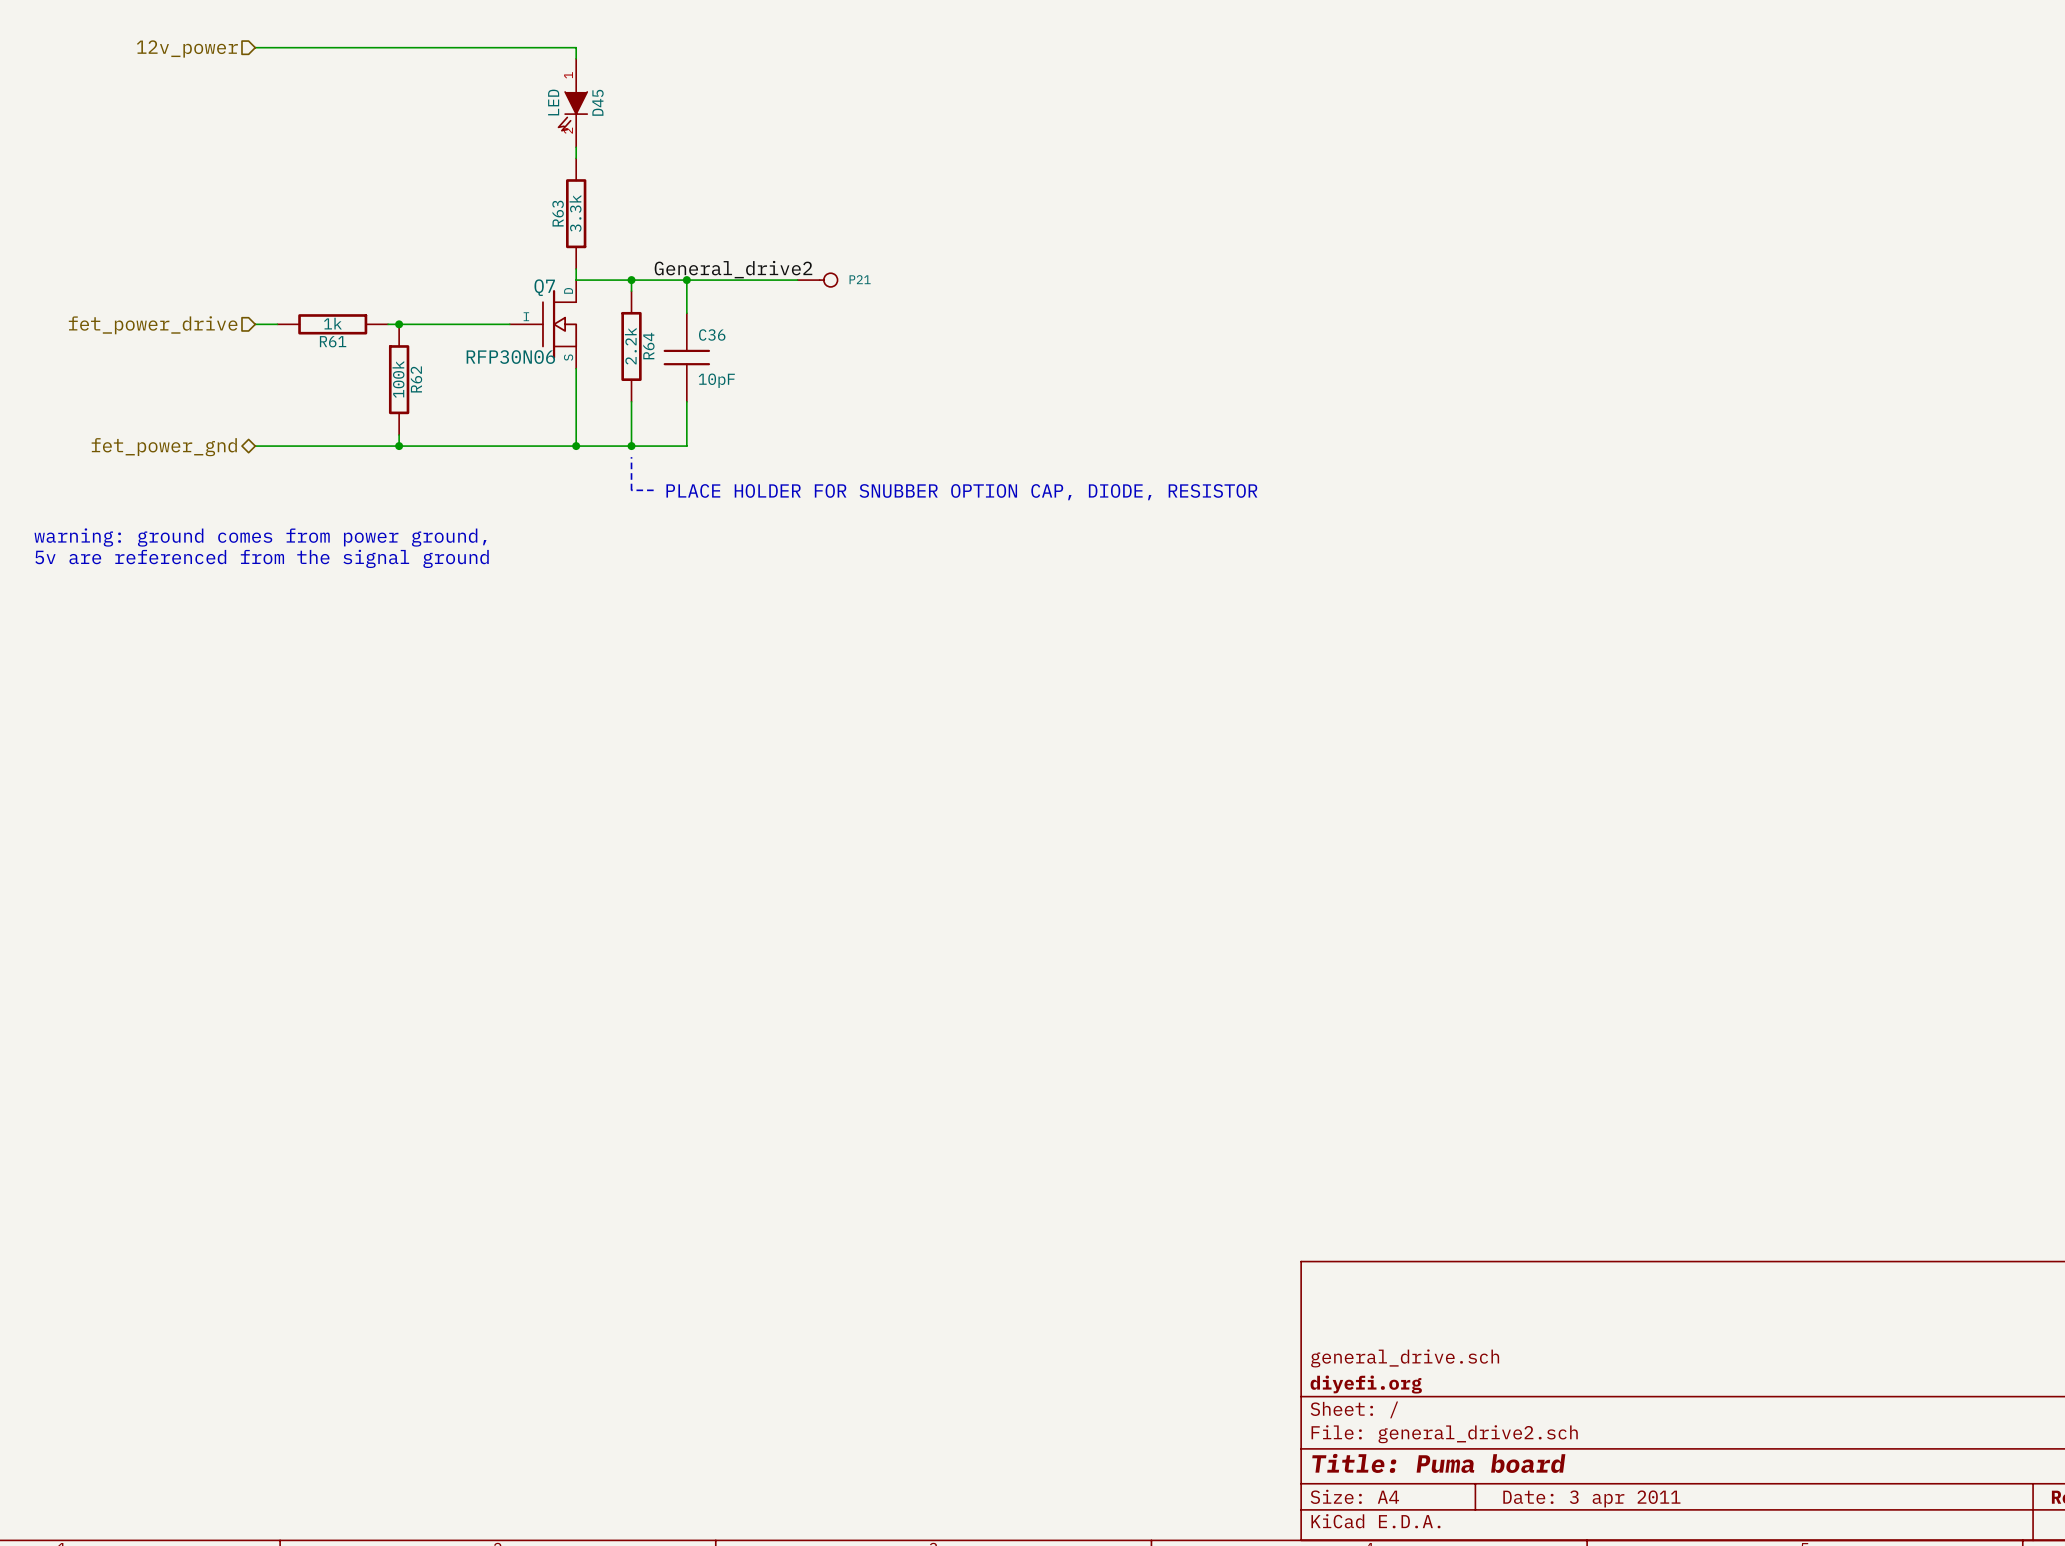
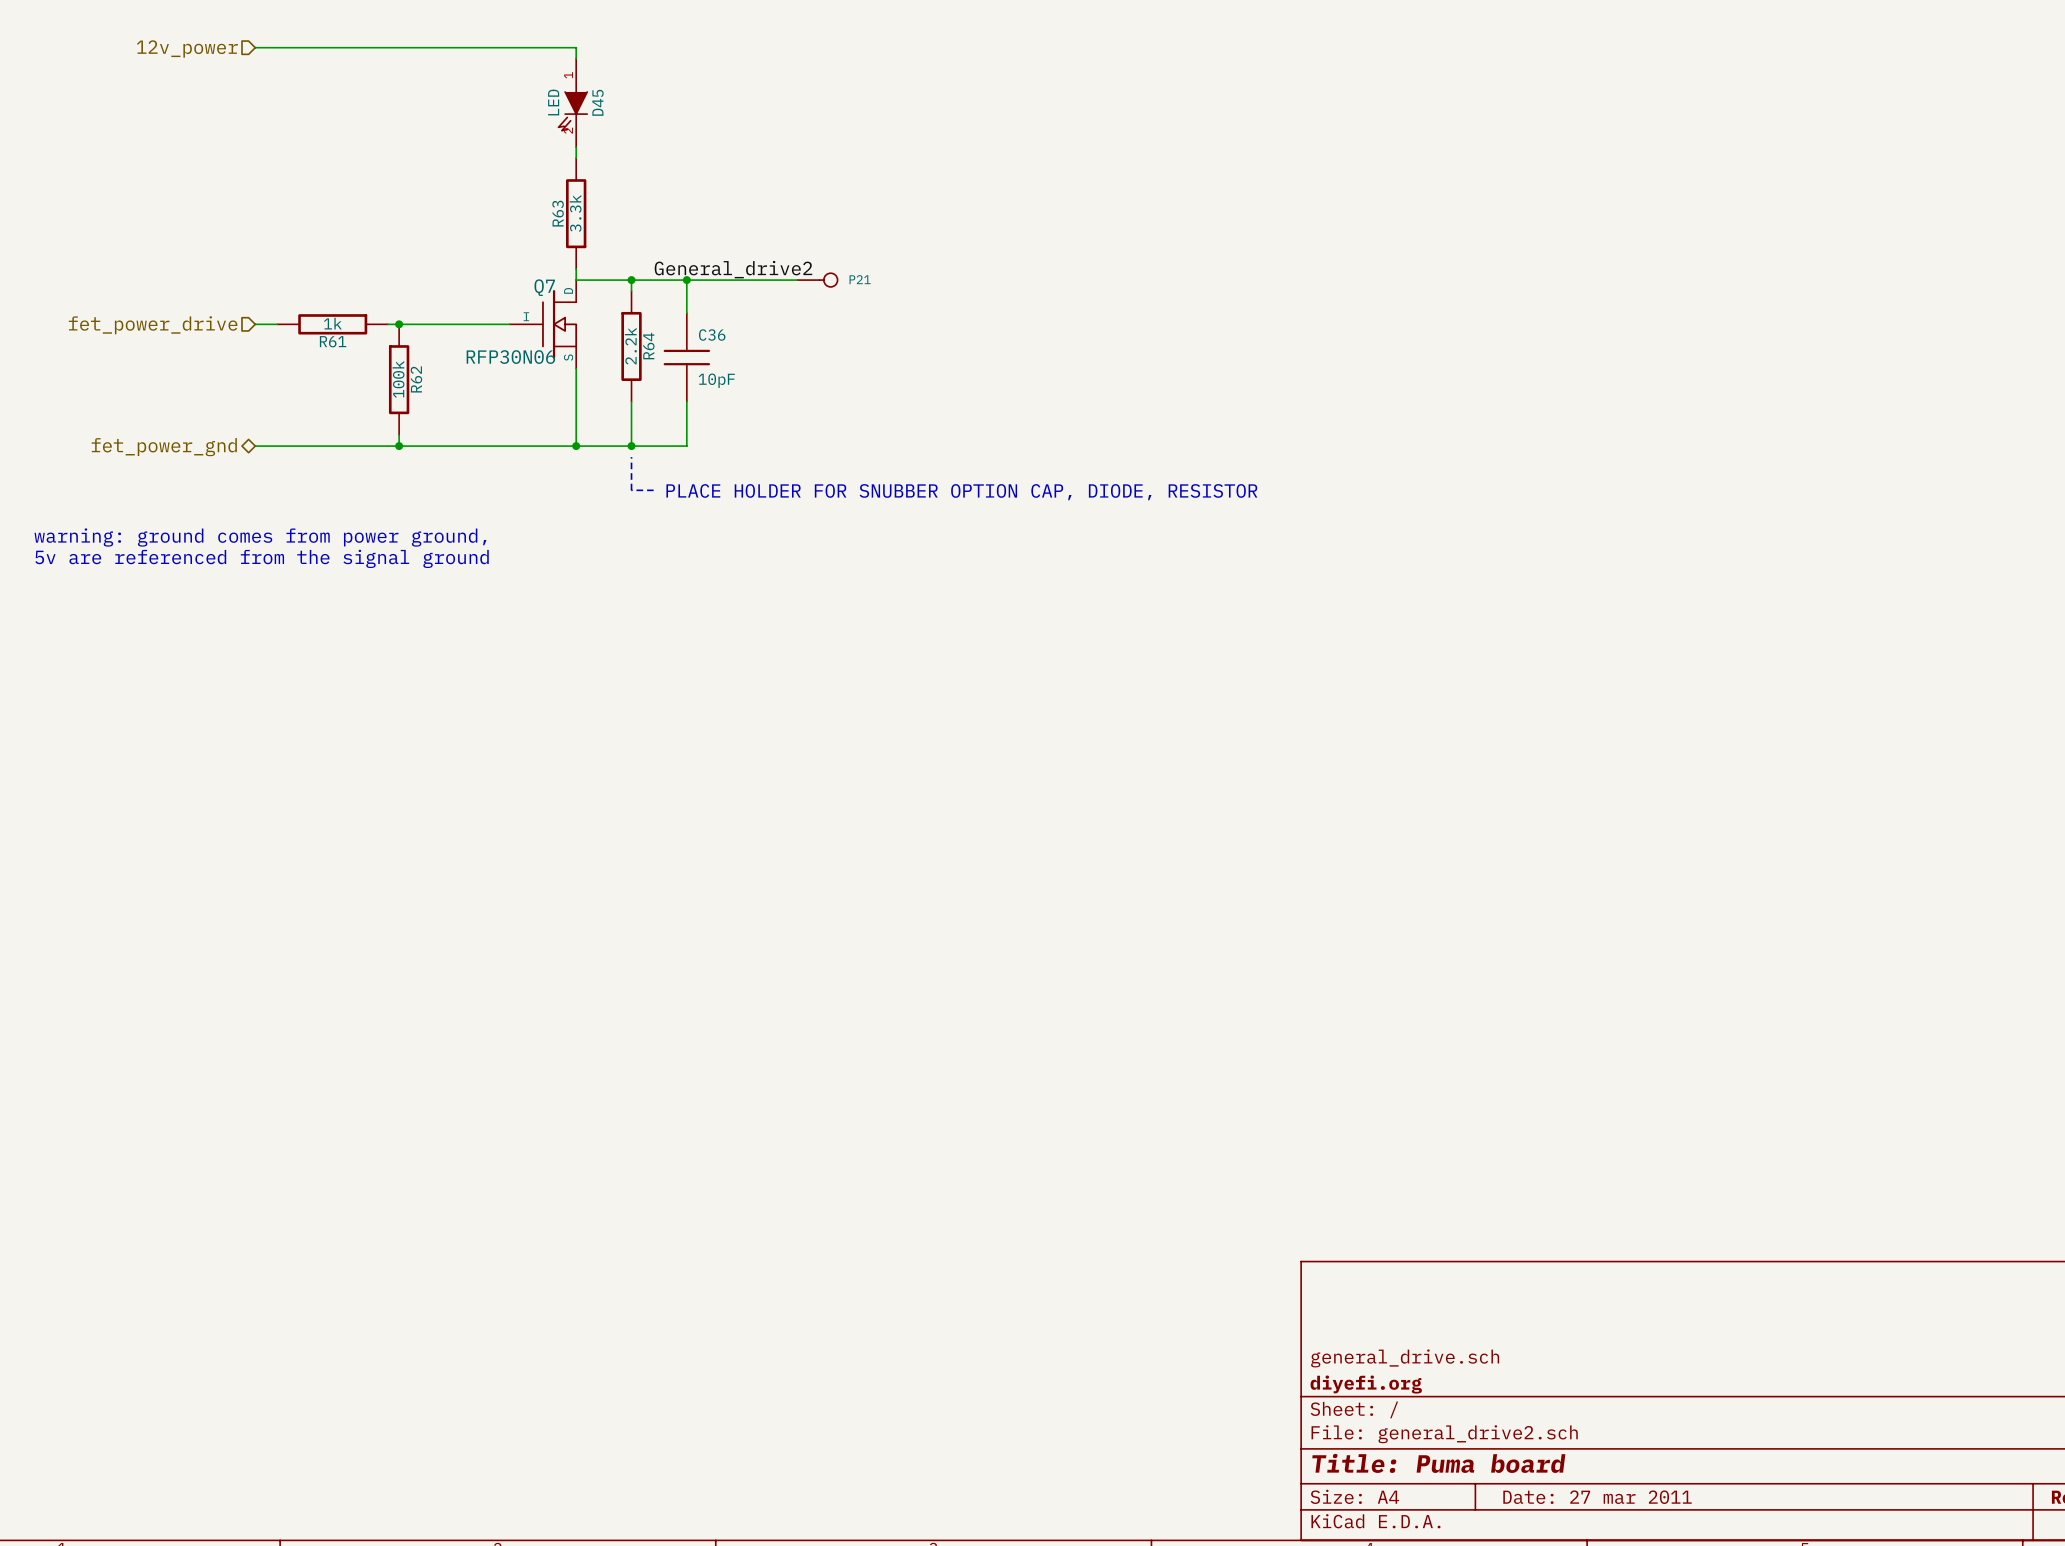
title block: Date: 3 apr 2011 (1591, 1498) -> Date: 27 mar 2011 (1597, 1497)

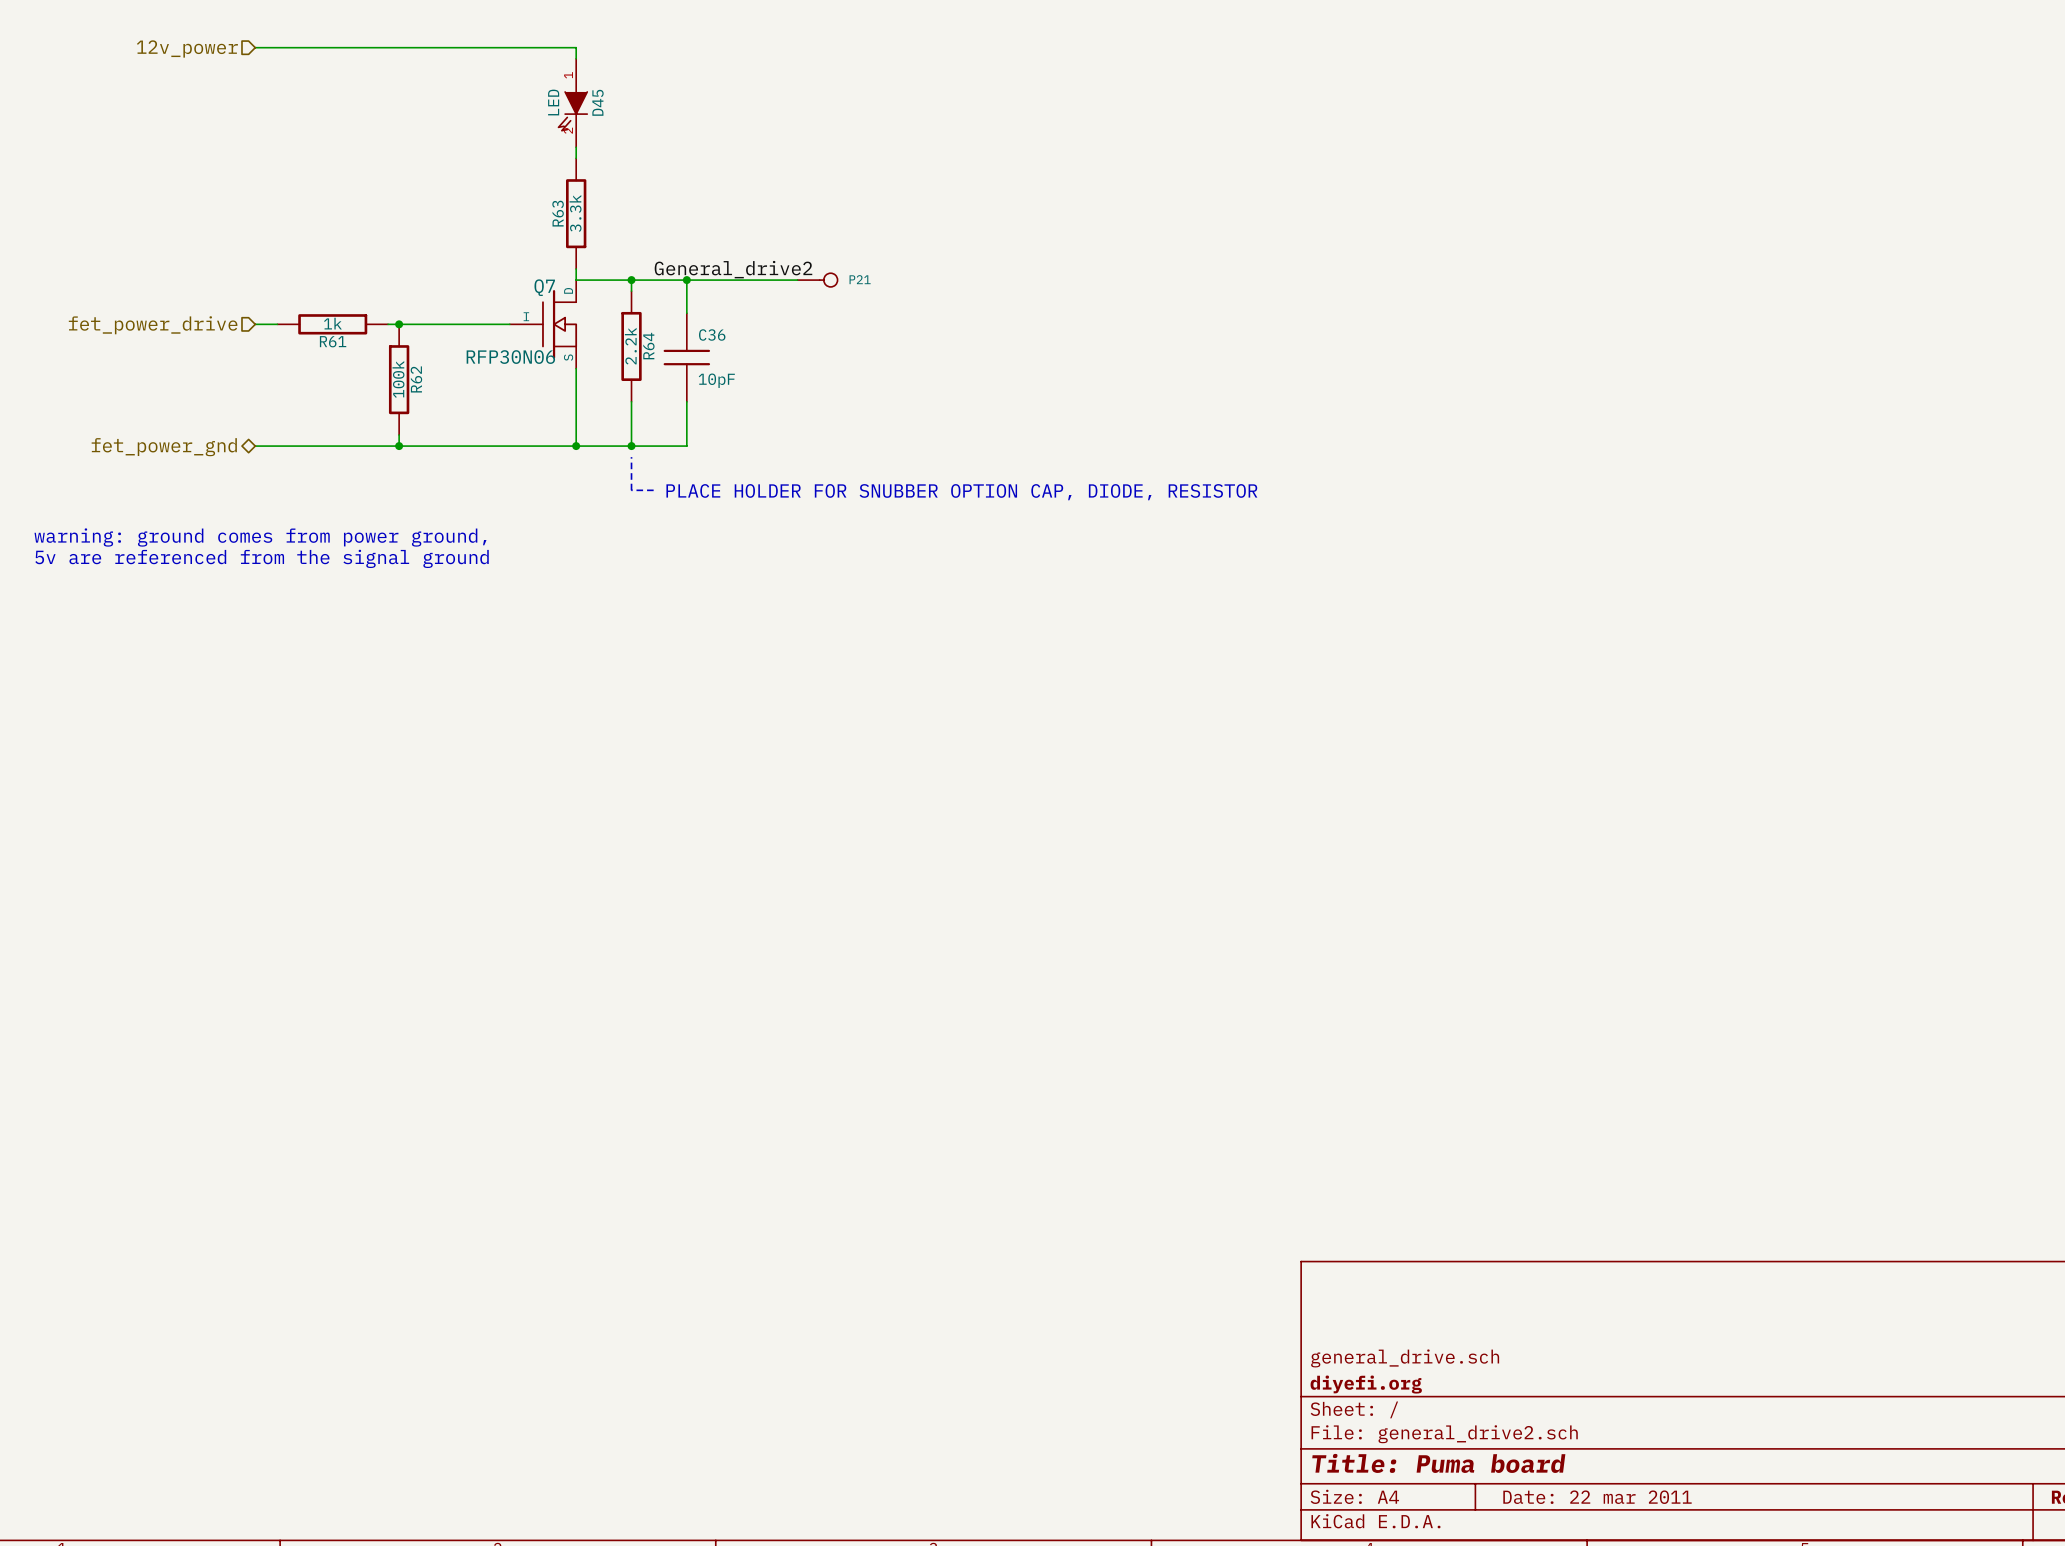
title block: Date: 27 mar 2011 (1597, 1497) -> Date: 22 mar 2011 (1597, 1497)

